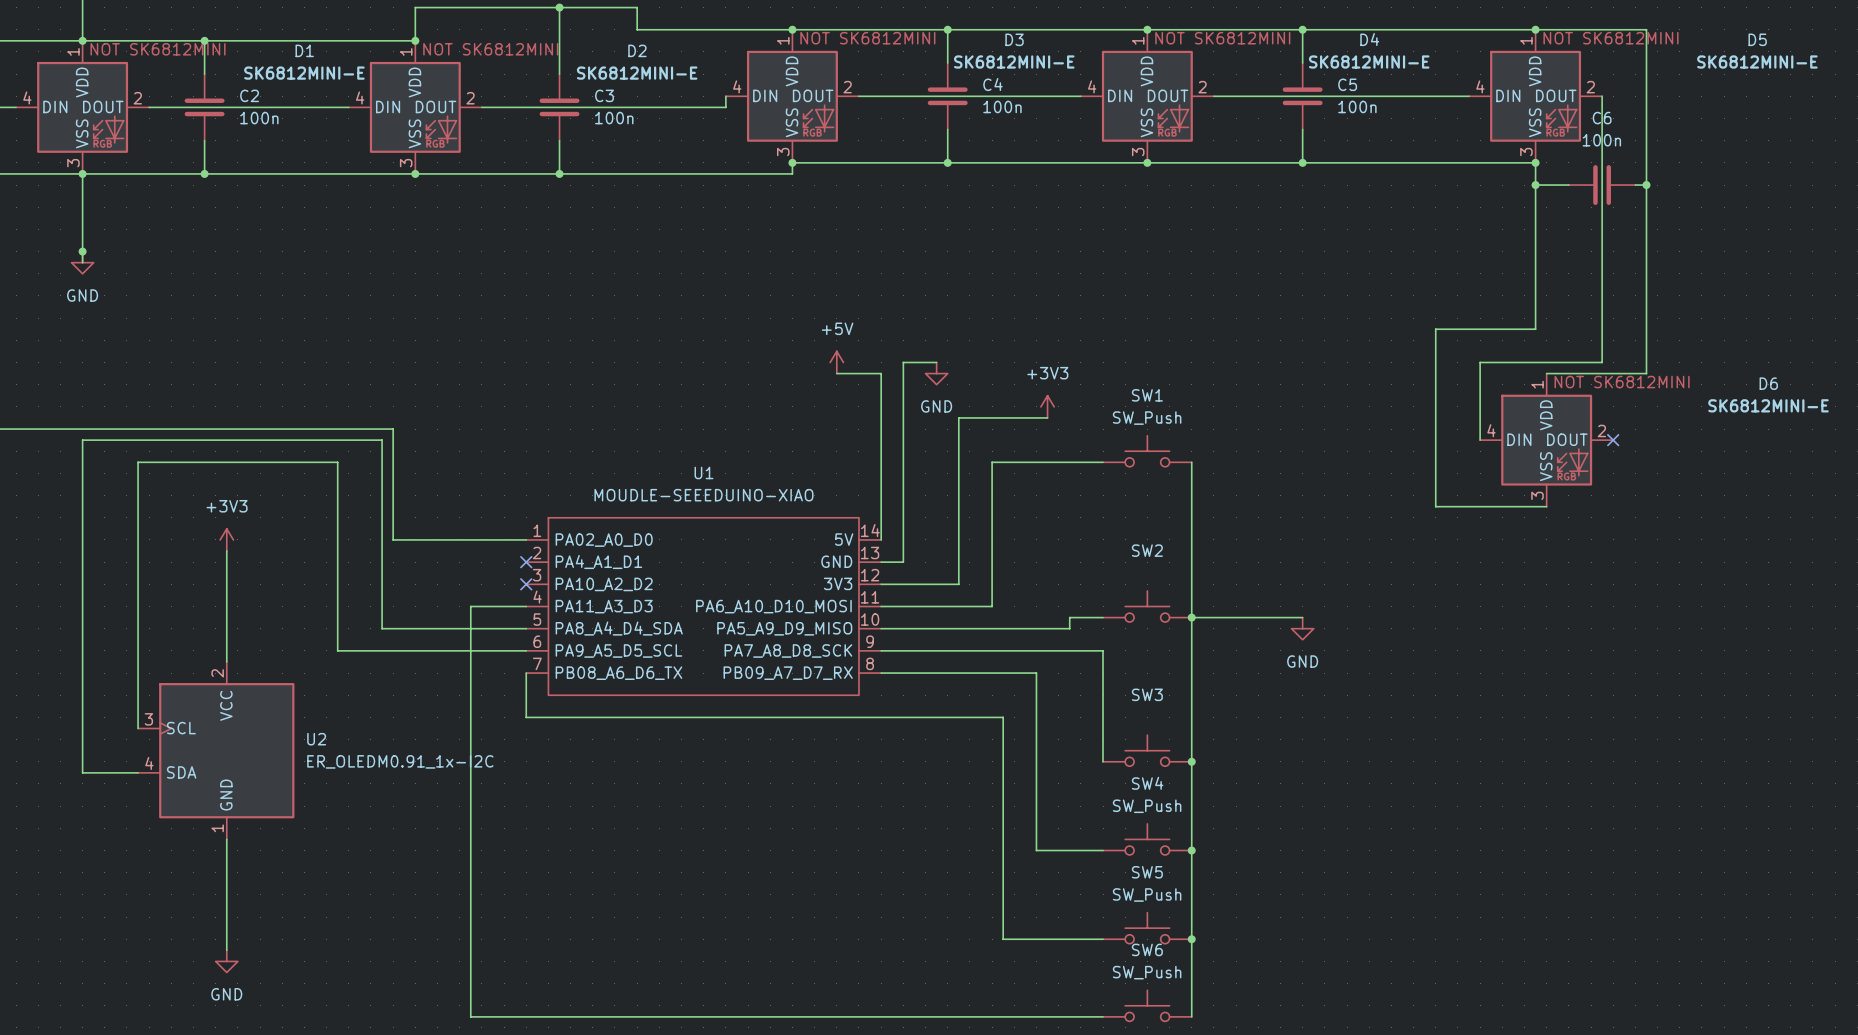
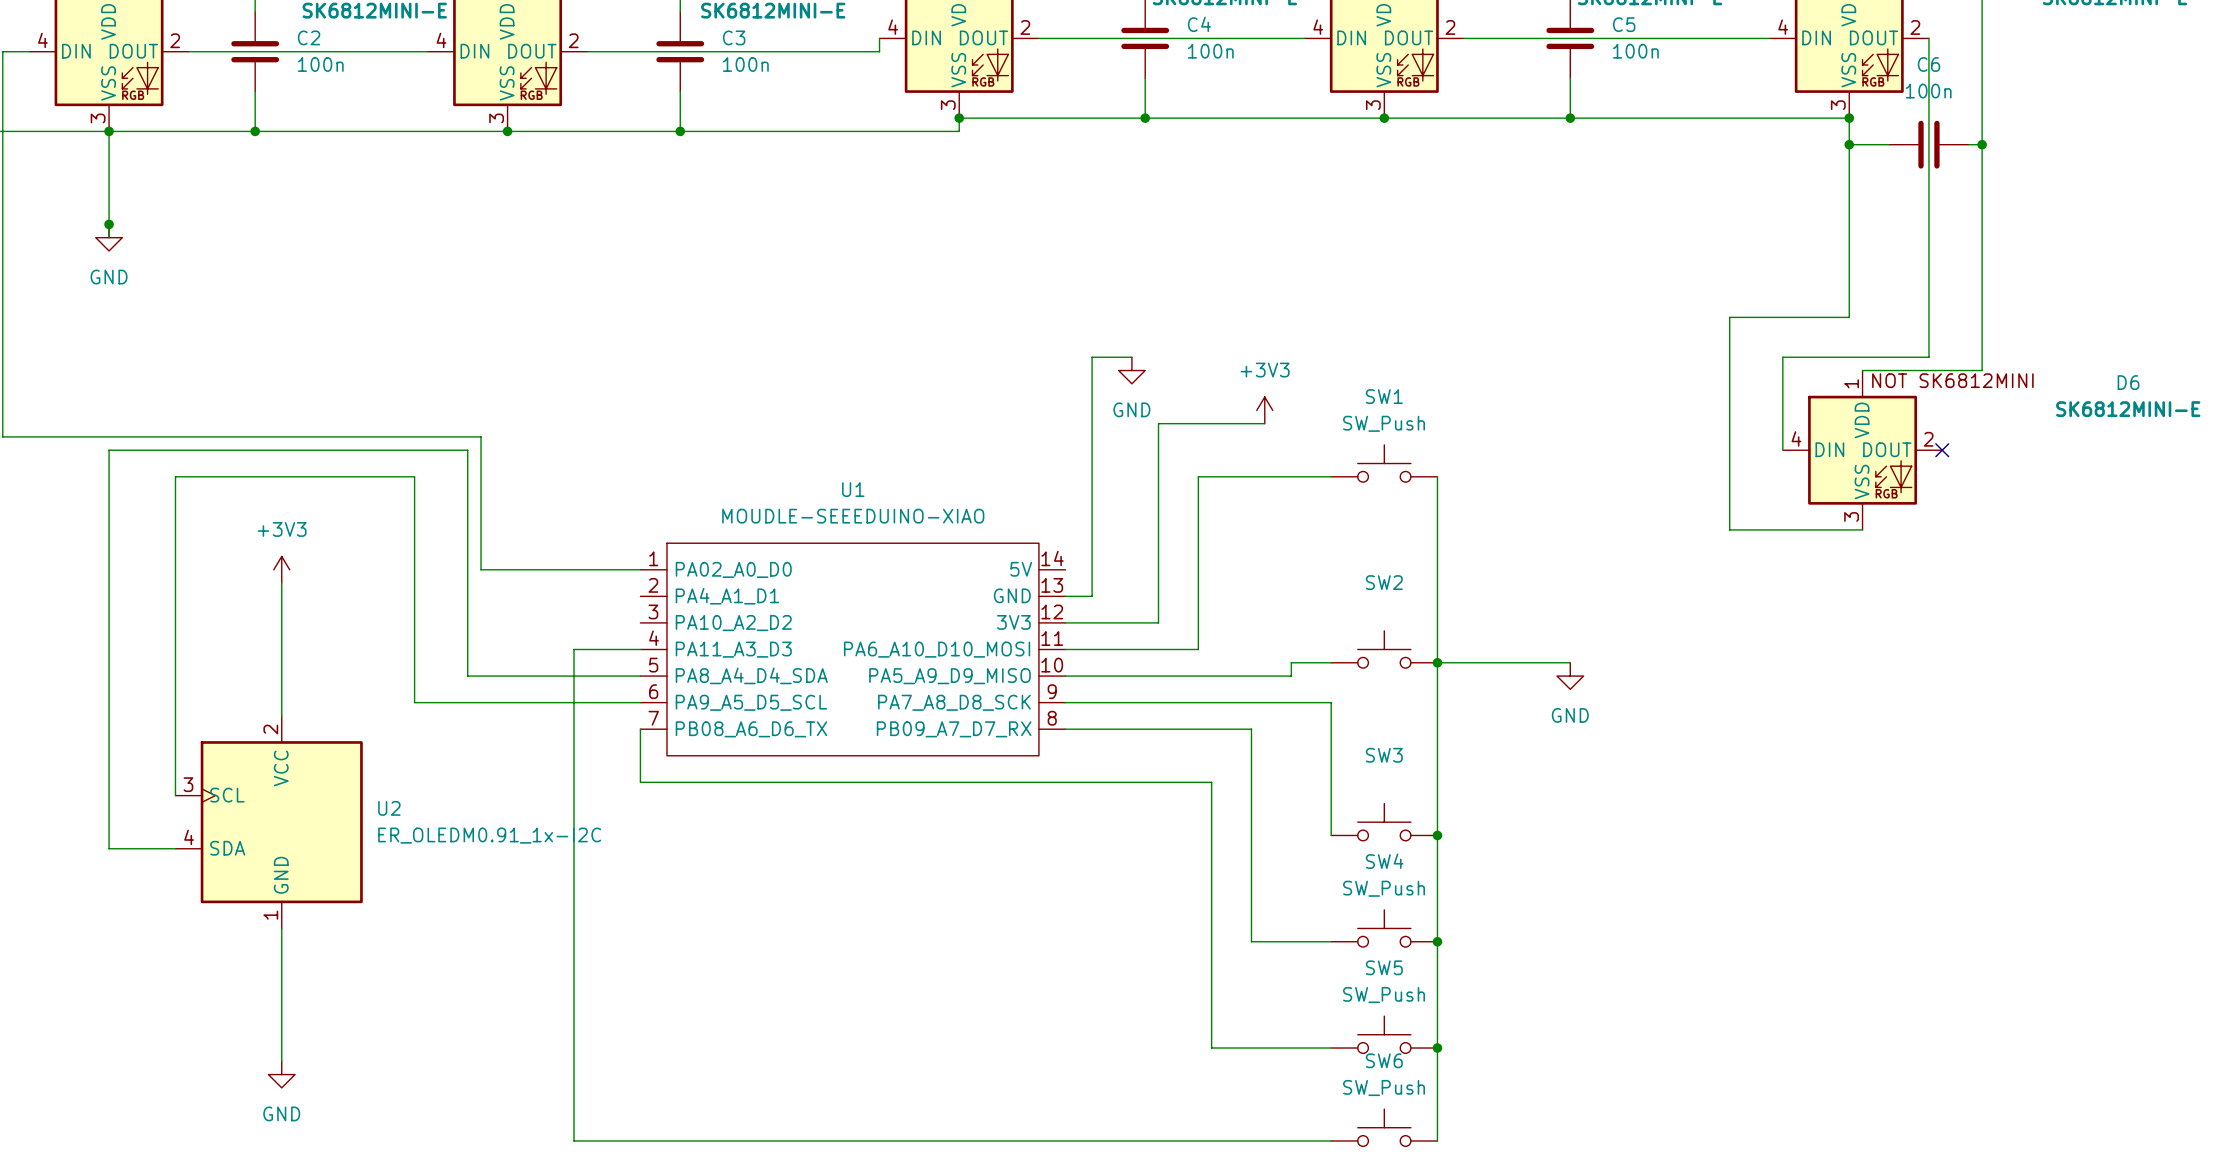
power symbol: +5V (836, 362) -> none
wire: (836, 373) (881, 373) (881, 539) -> none
no-connect mark: (526, 562) -> none
no-connect mark: (526, 584) -> none

